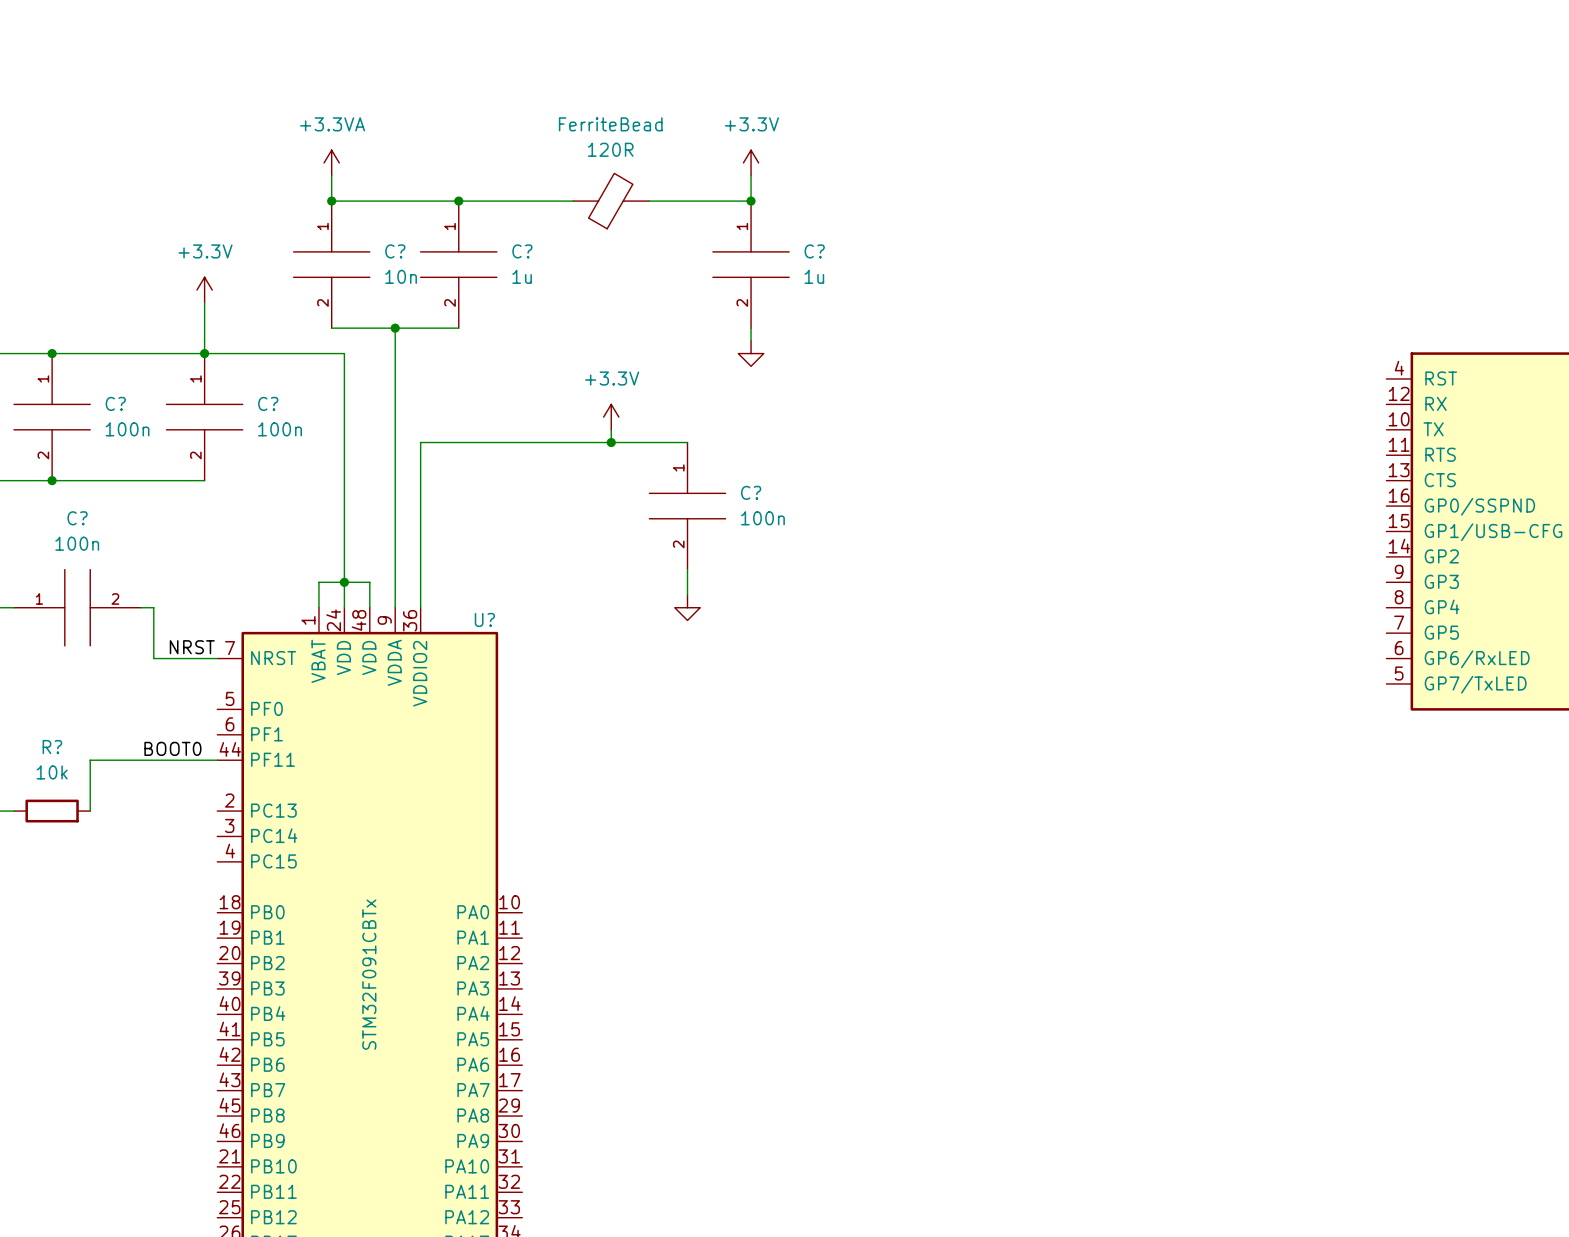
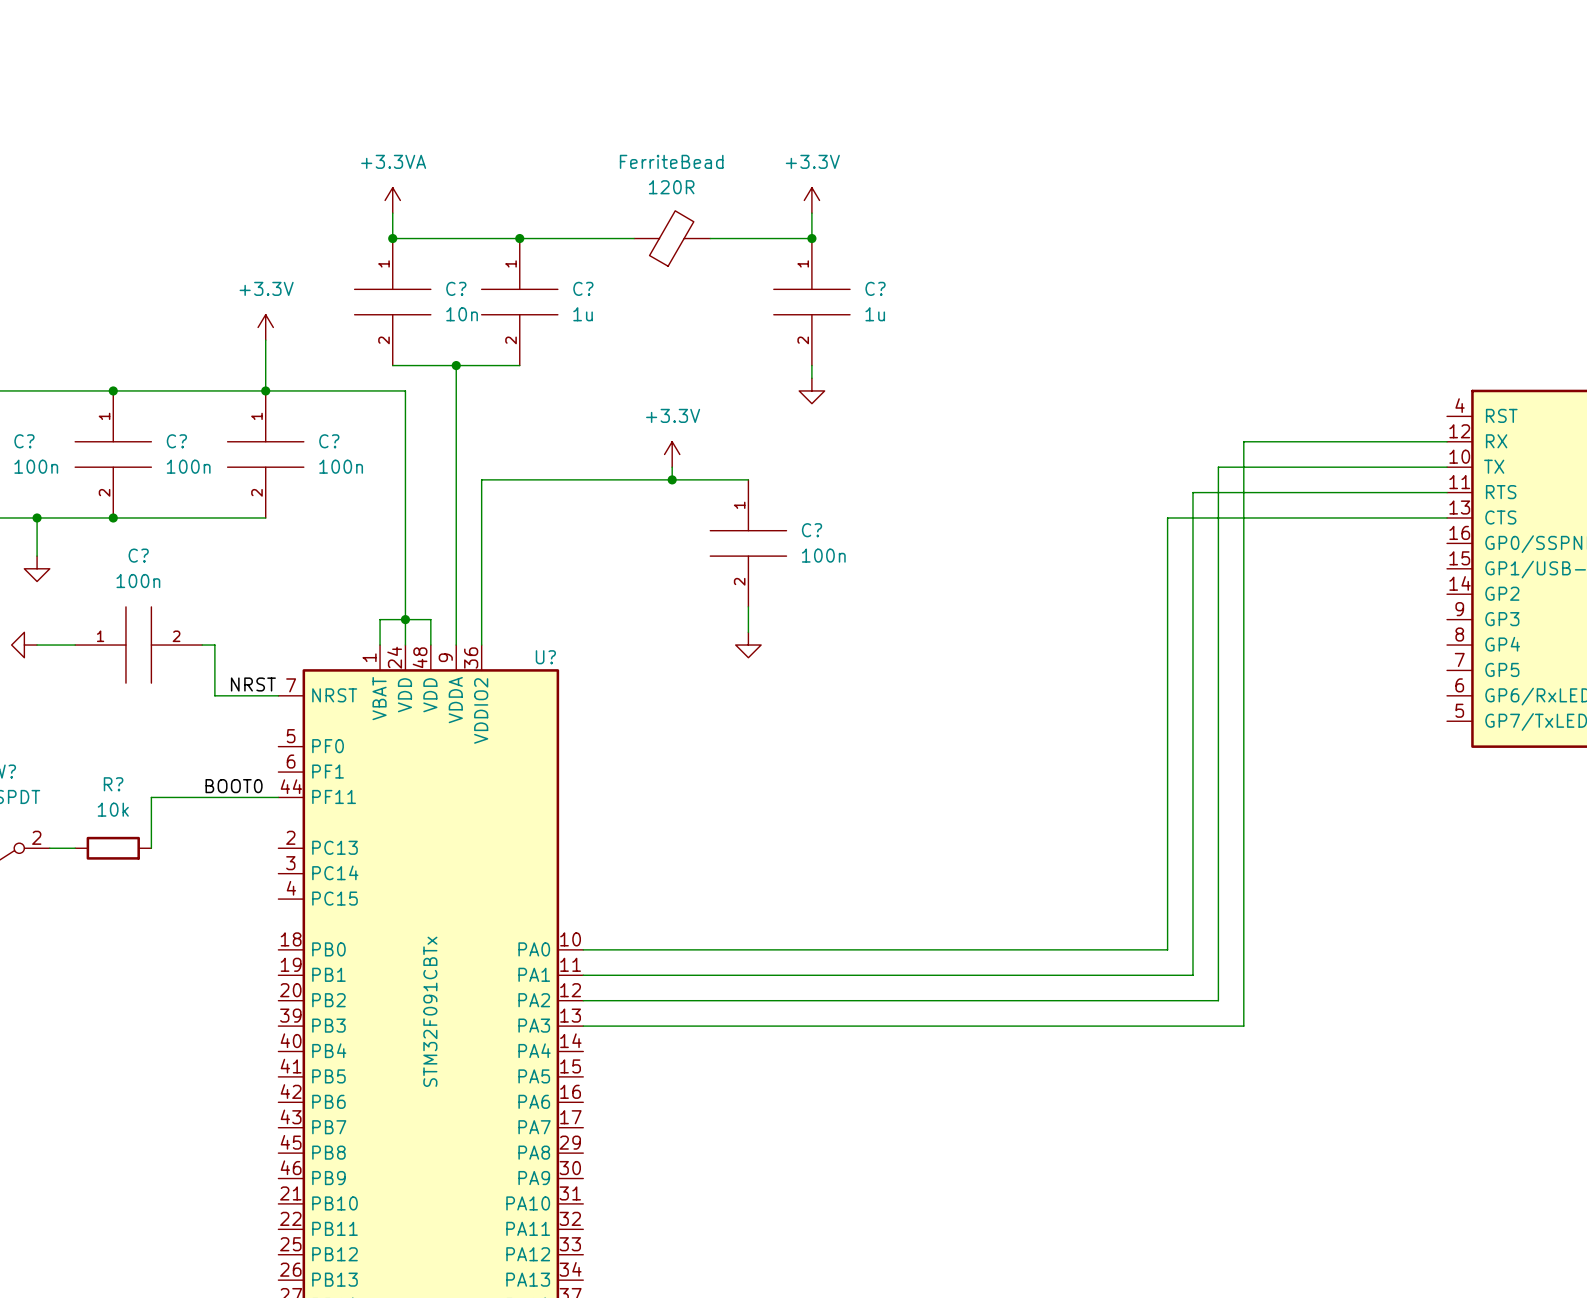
wire: none -> (1447, 441) (1243, 441) (1243, 1026) (583, 1026)
wire: none -> (1447, 467) (1218, 467) (1218, 1000) (583, 1000)
wire: none -> (1447, 492) (1192, 492) (1192, 975) (583, 975)
wire: none -> (1447, 517) (1167, 517) (1167, 949) (583, 949)

